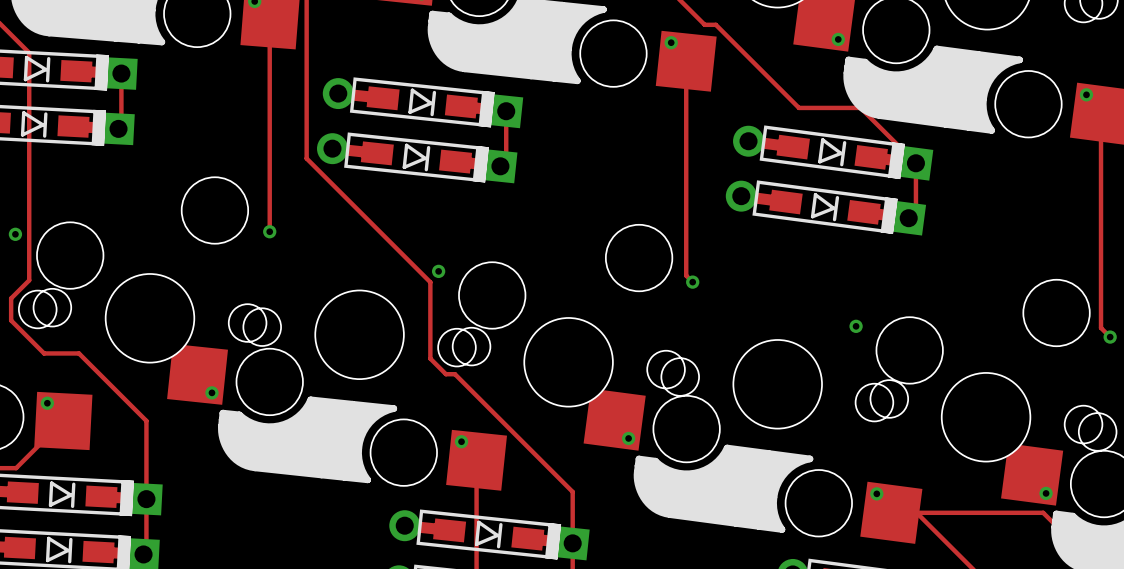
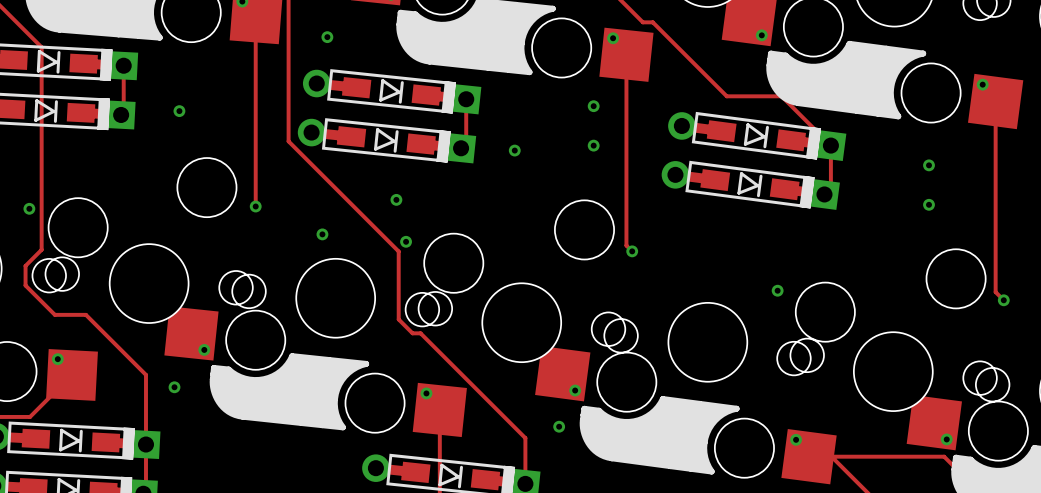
via: none -> (327, 37)
via: none -> (593, 106)
via: none -> (179, 111)
via: none -> (593, 145)
via: none -> (514, 150)
via: none -> (929, 165)
via: none -> (396, 199)
via: none -> (929, 204)
via: none -> (322, 234)
via: none -> (174, 387)
via: none -> (559, 426)

